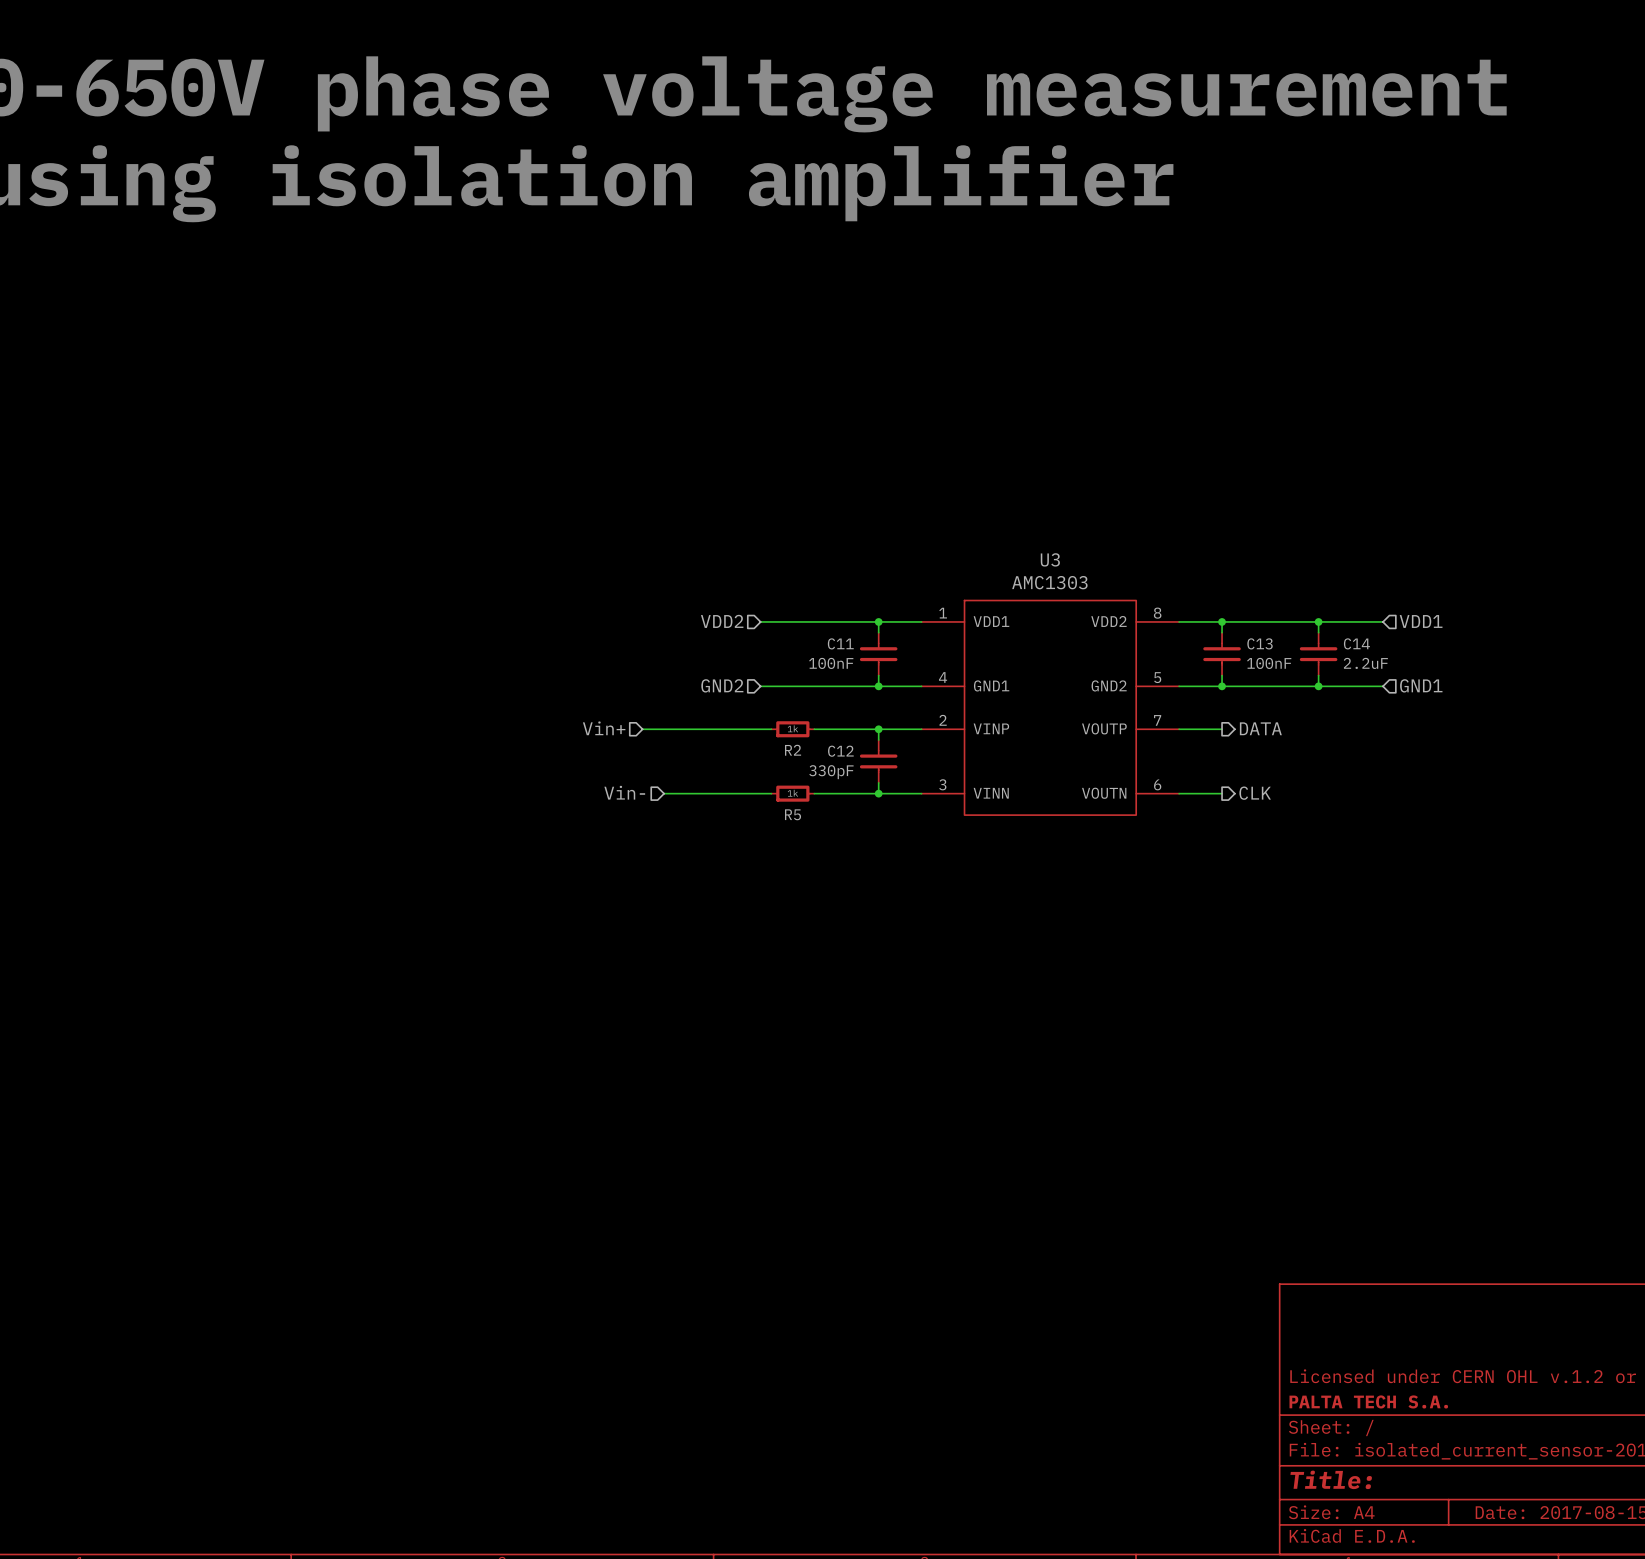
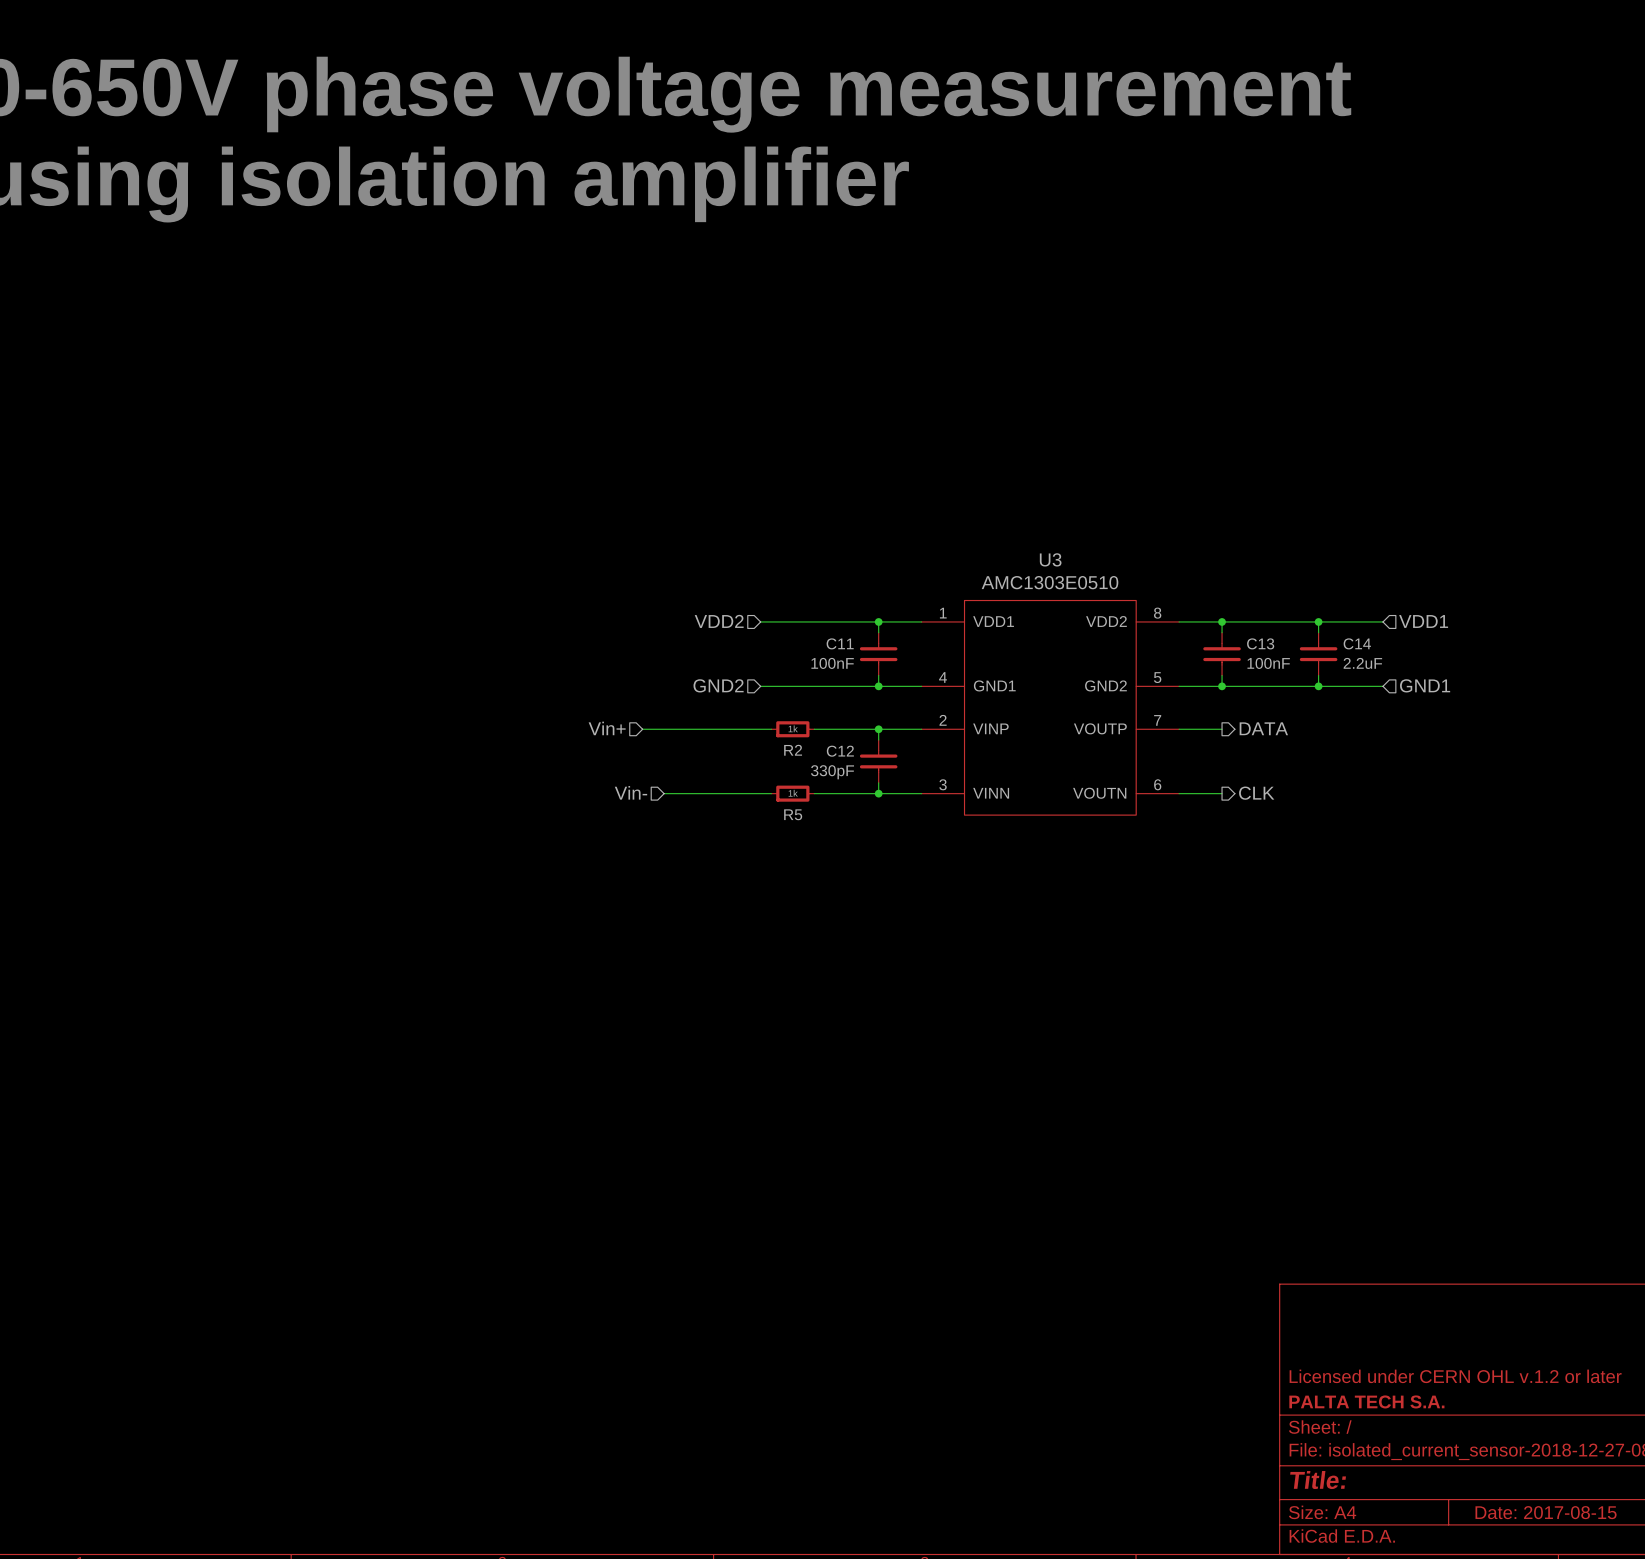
U3 value: AMC1303 (1049, 582) -> AMC1303E0510 (1050, 582)

